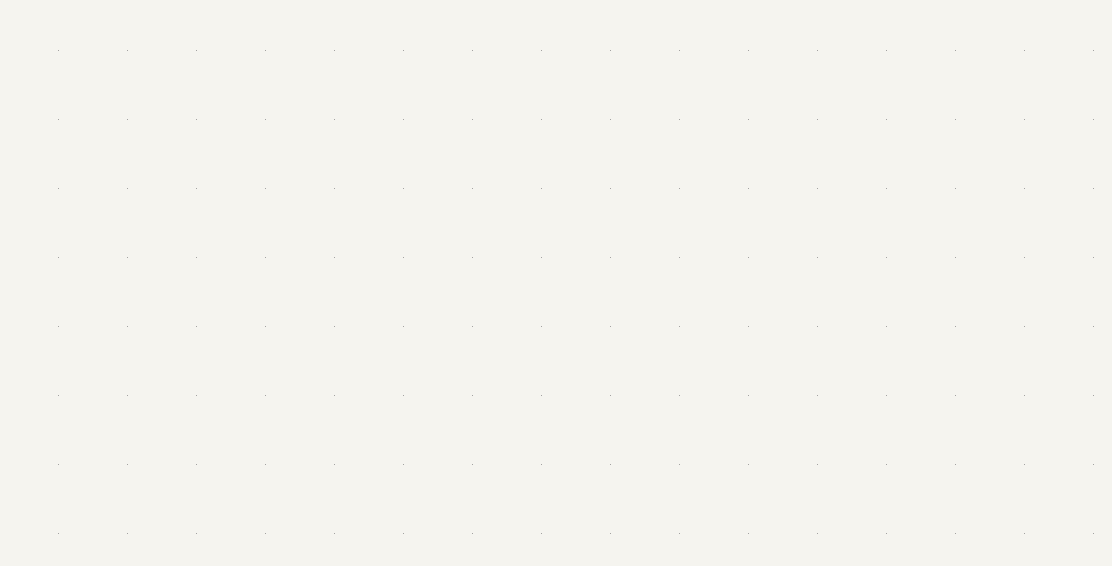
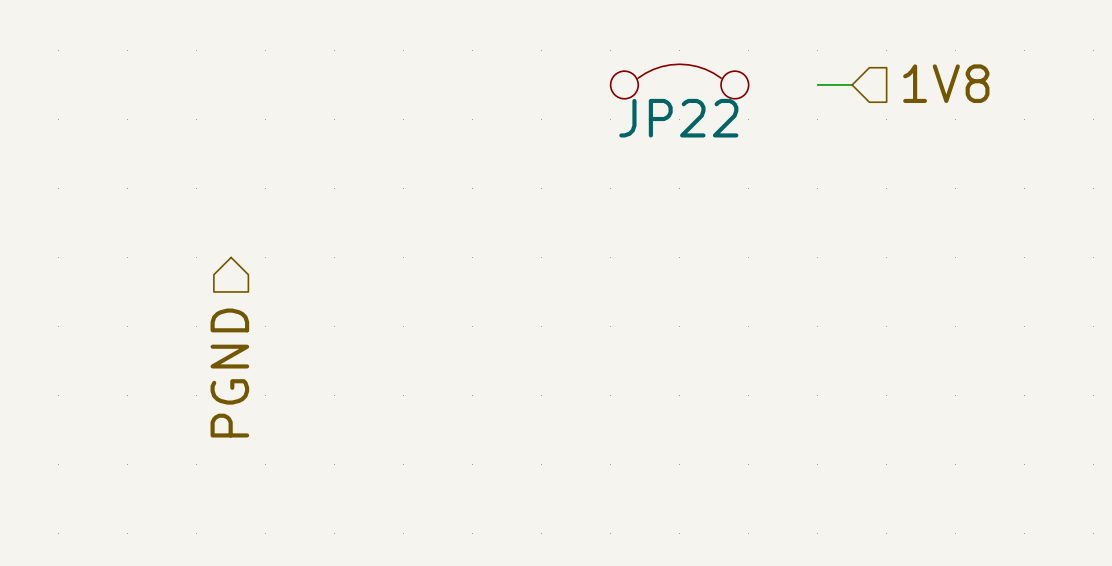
JP22: none -> (679, 81)
hierarchical label: none -> 1V8 (946, 83)
wire: none -> (817, 84) (852, 84)
hierarchical label: none -> PGND (229, 373)

